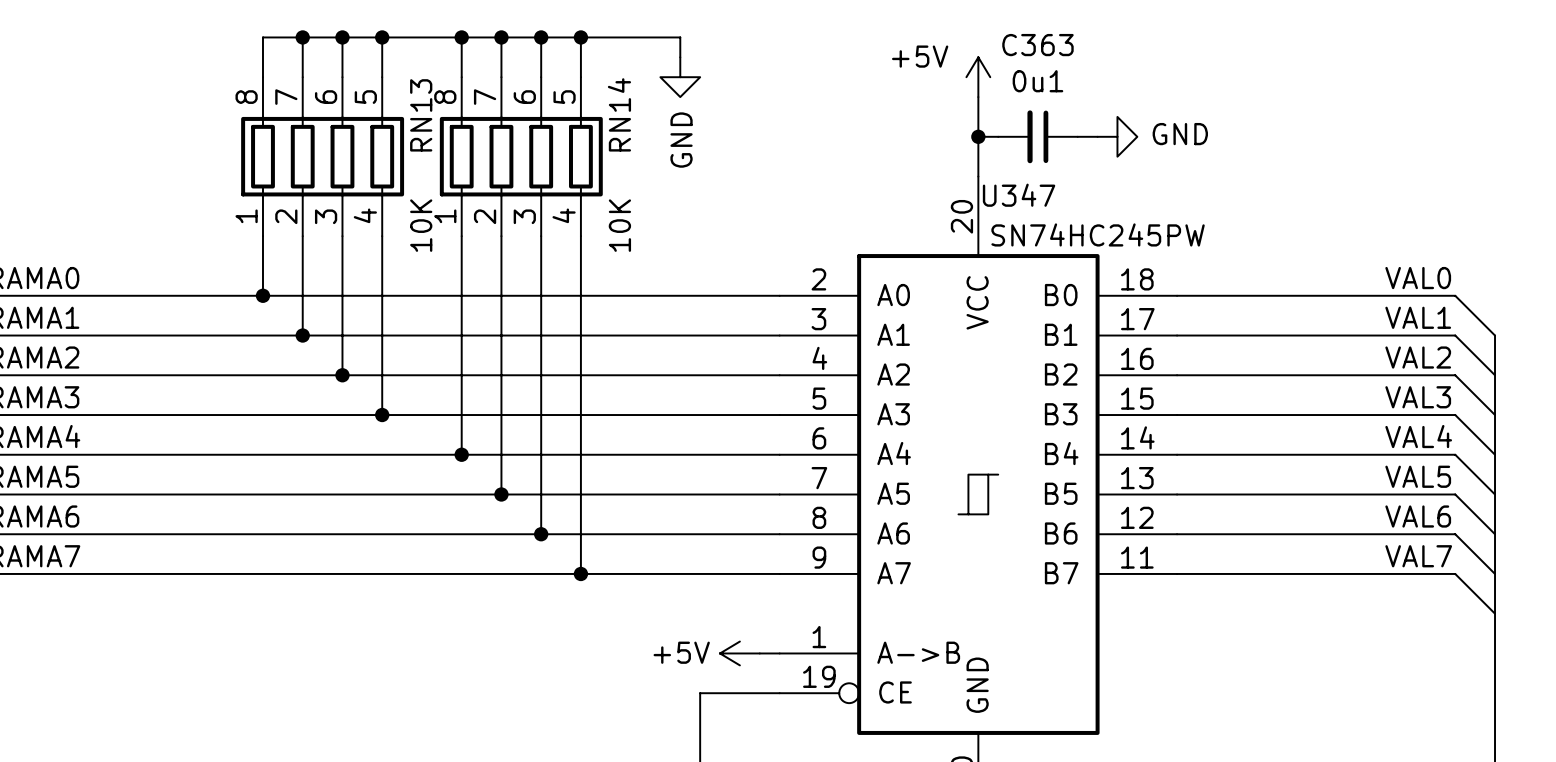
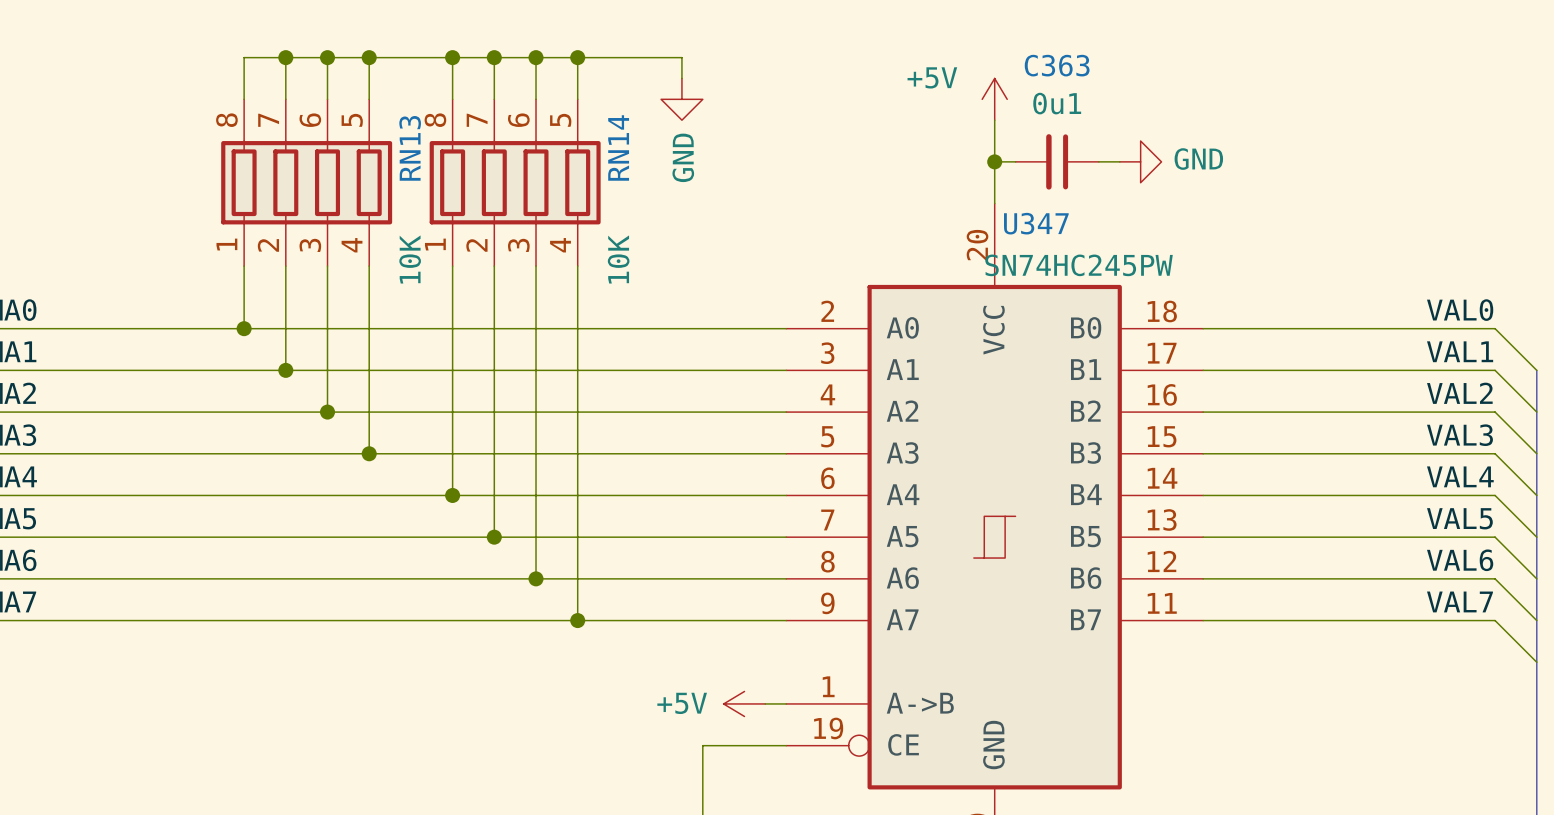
U347 value position: SN74HC245PW (1098, 234) -> SN74HC245PW (1079, 265)

